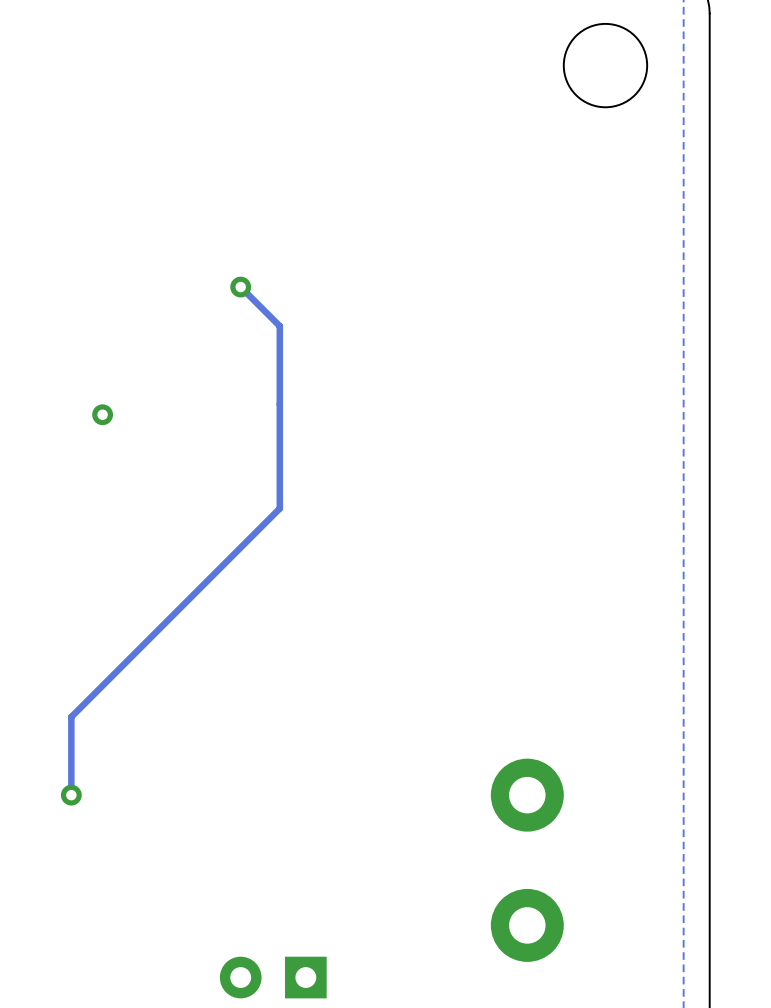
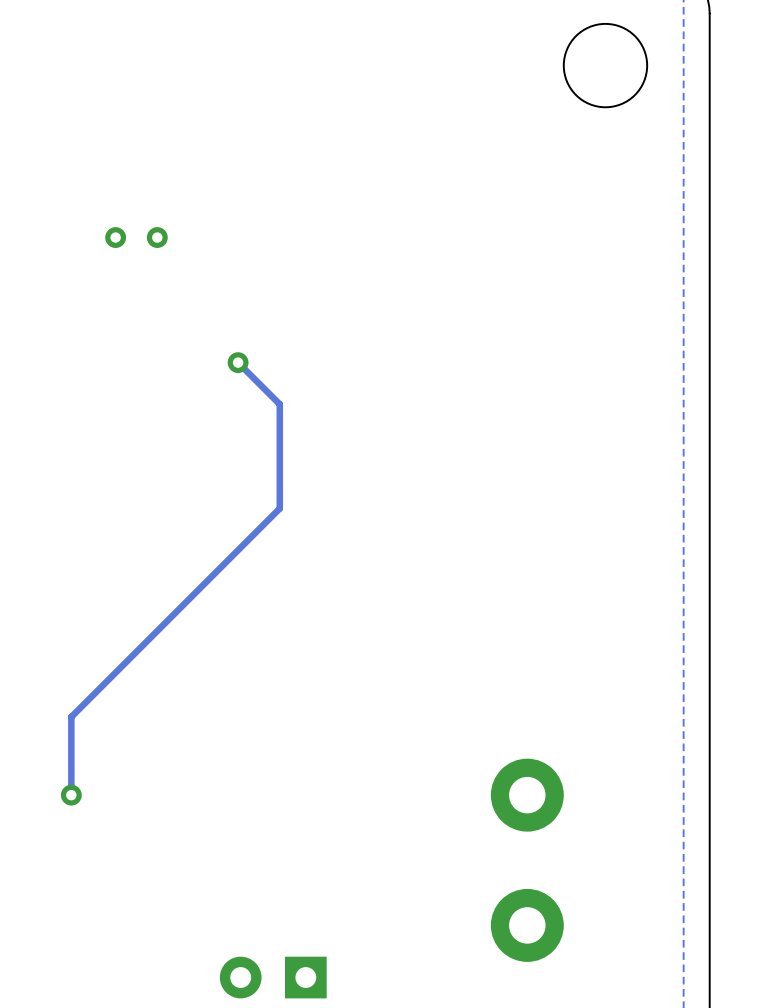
via: none -> (115, 237)
via: none -> (157, 237)
track: (240, 287) (279, 326) (279, 404) -> (238, 362) (279, 404)
via: (240, 287) -> none
via: none -> (238, 362)
via: (102, 414) -> none

